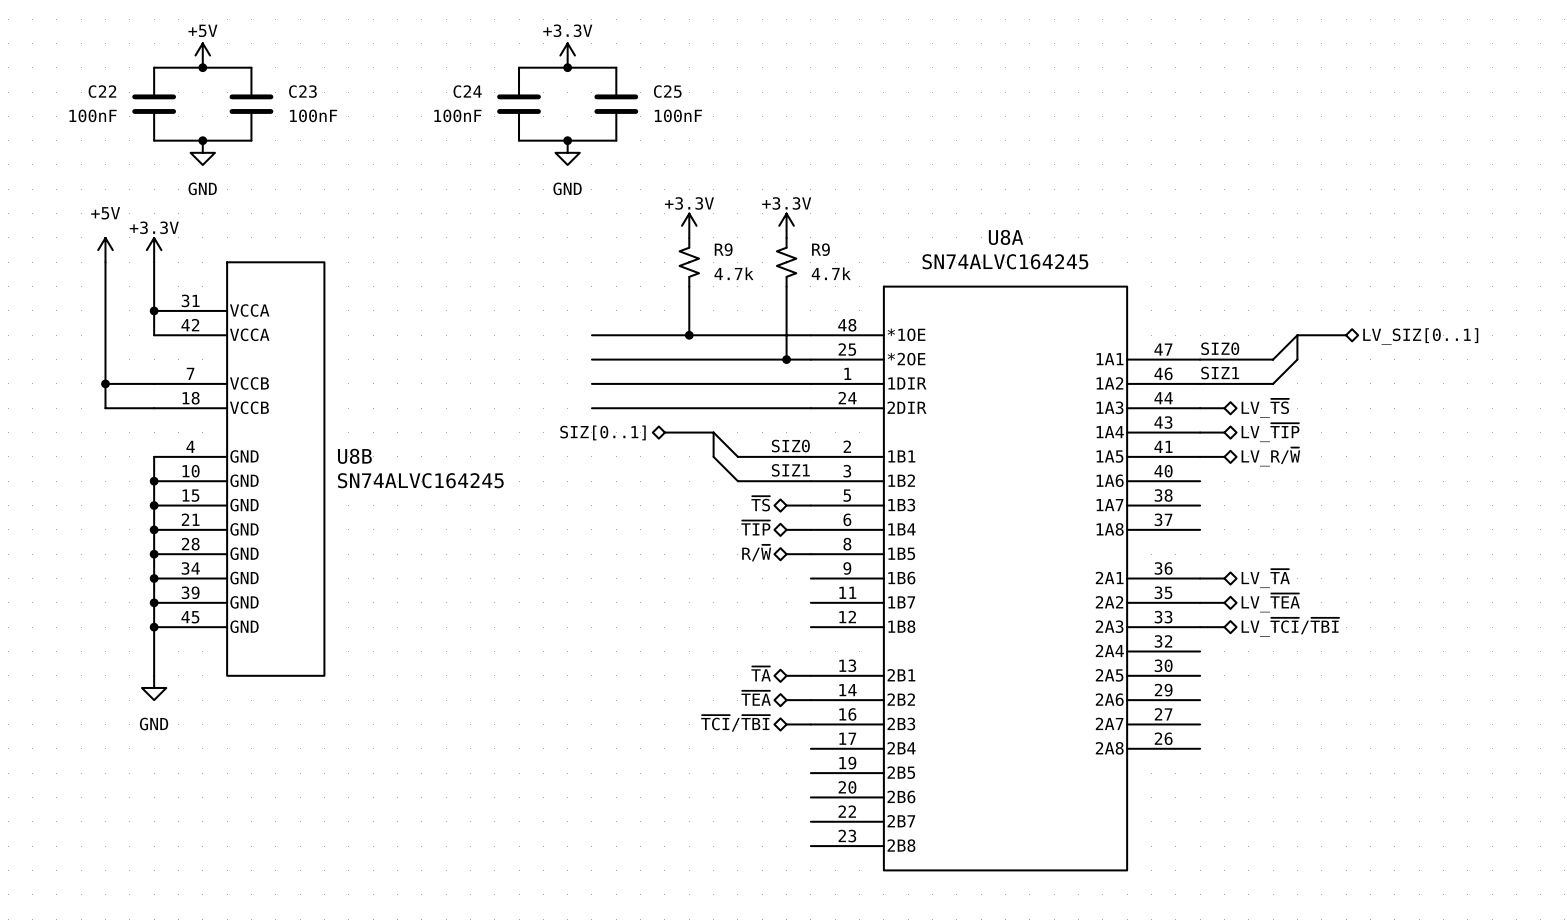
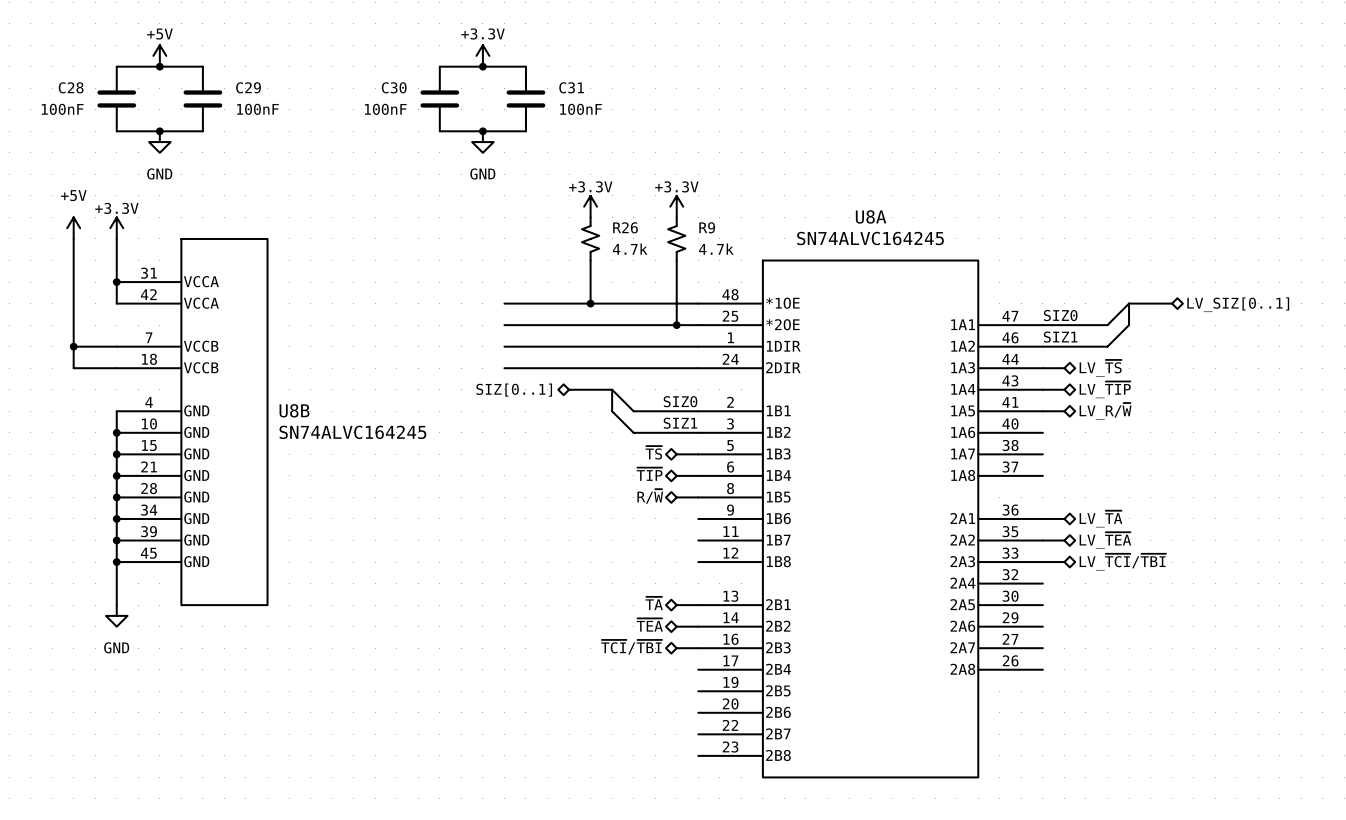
C22 name: C22 (102, 91) -> C28 (71, 87)
C23 name: C23 (302, 91) -> C29 (248, 87)
C24 name: C24 (467, 91) -> C30 (394, 87)
C25 name: C25 (667, 91) -> C31 (571, 87)
R9 name: R9 (723, 249) -> R26 (625, 227)

